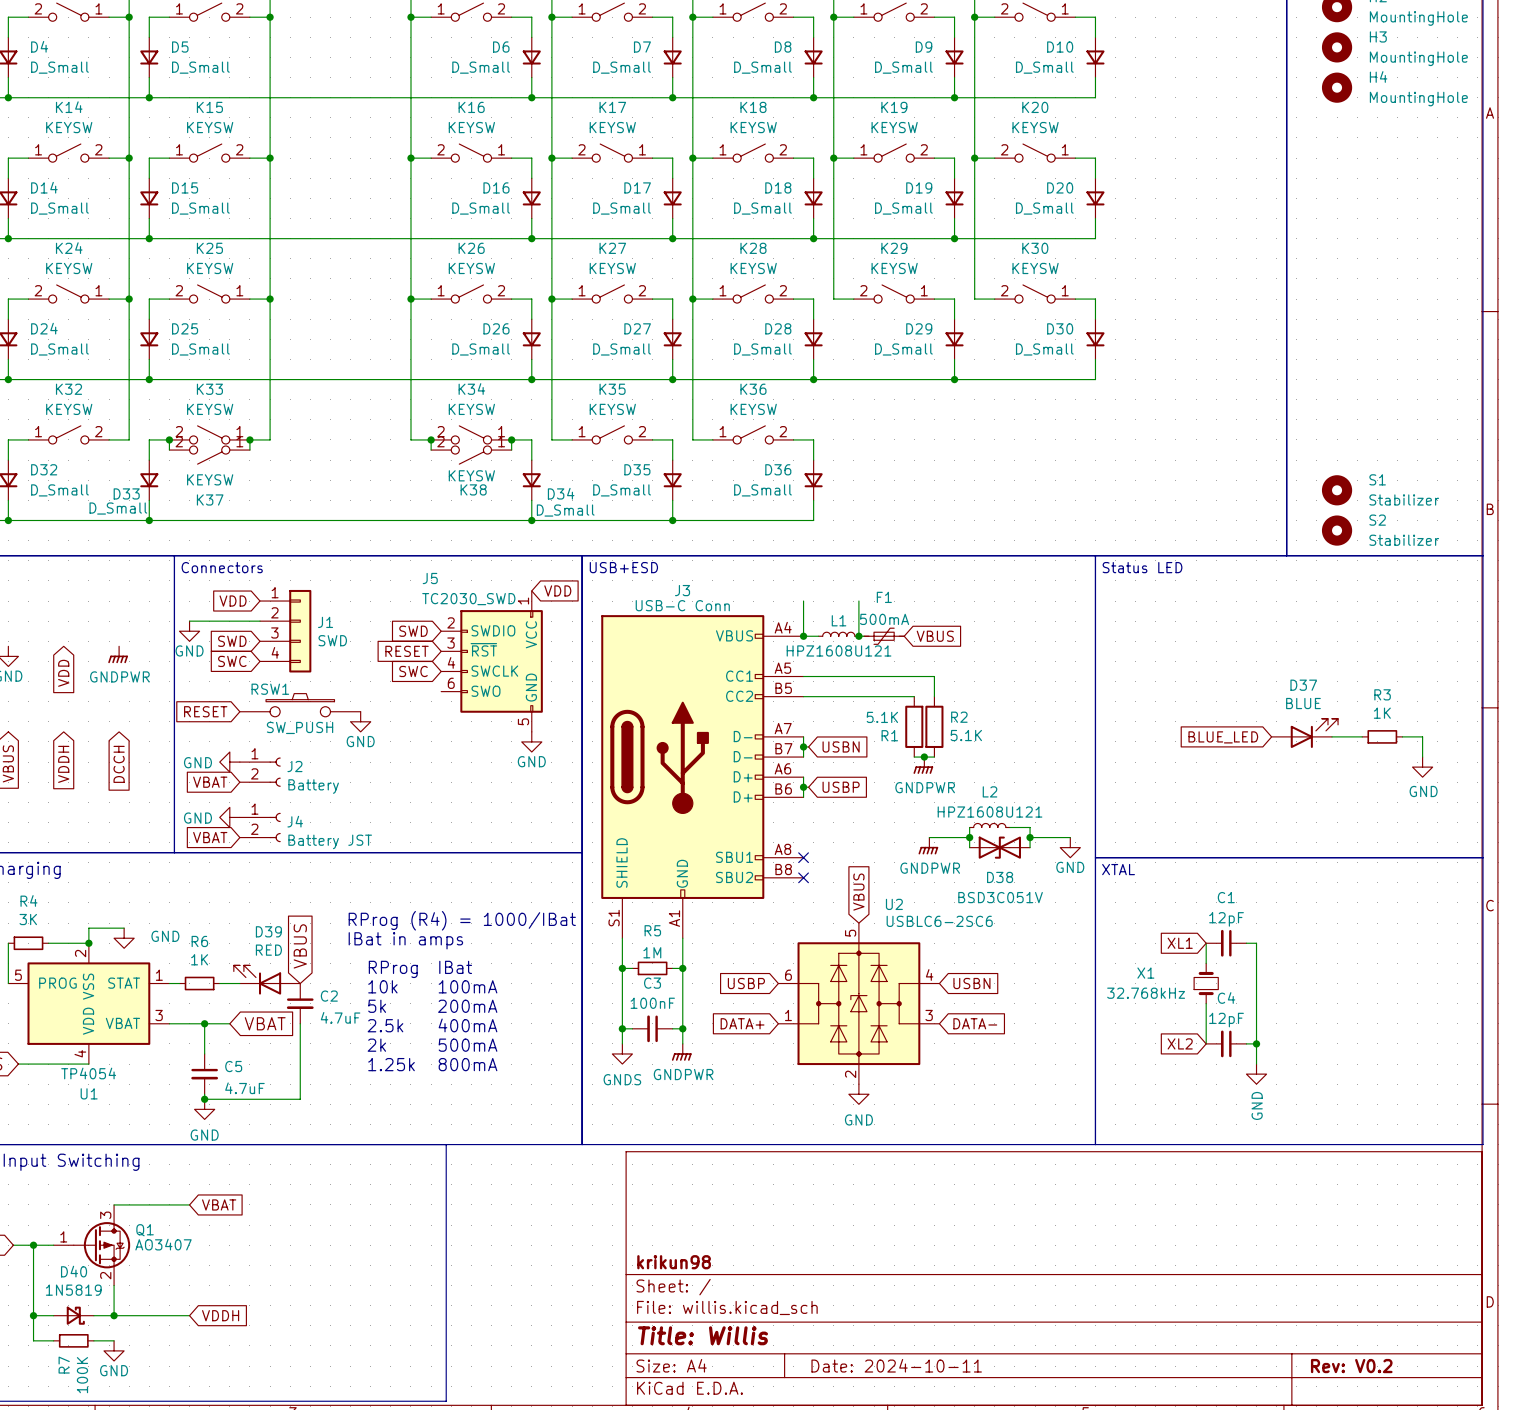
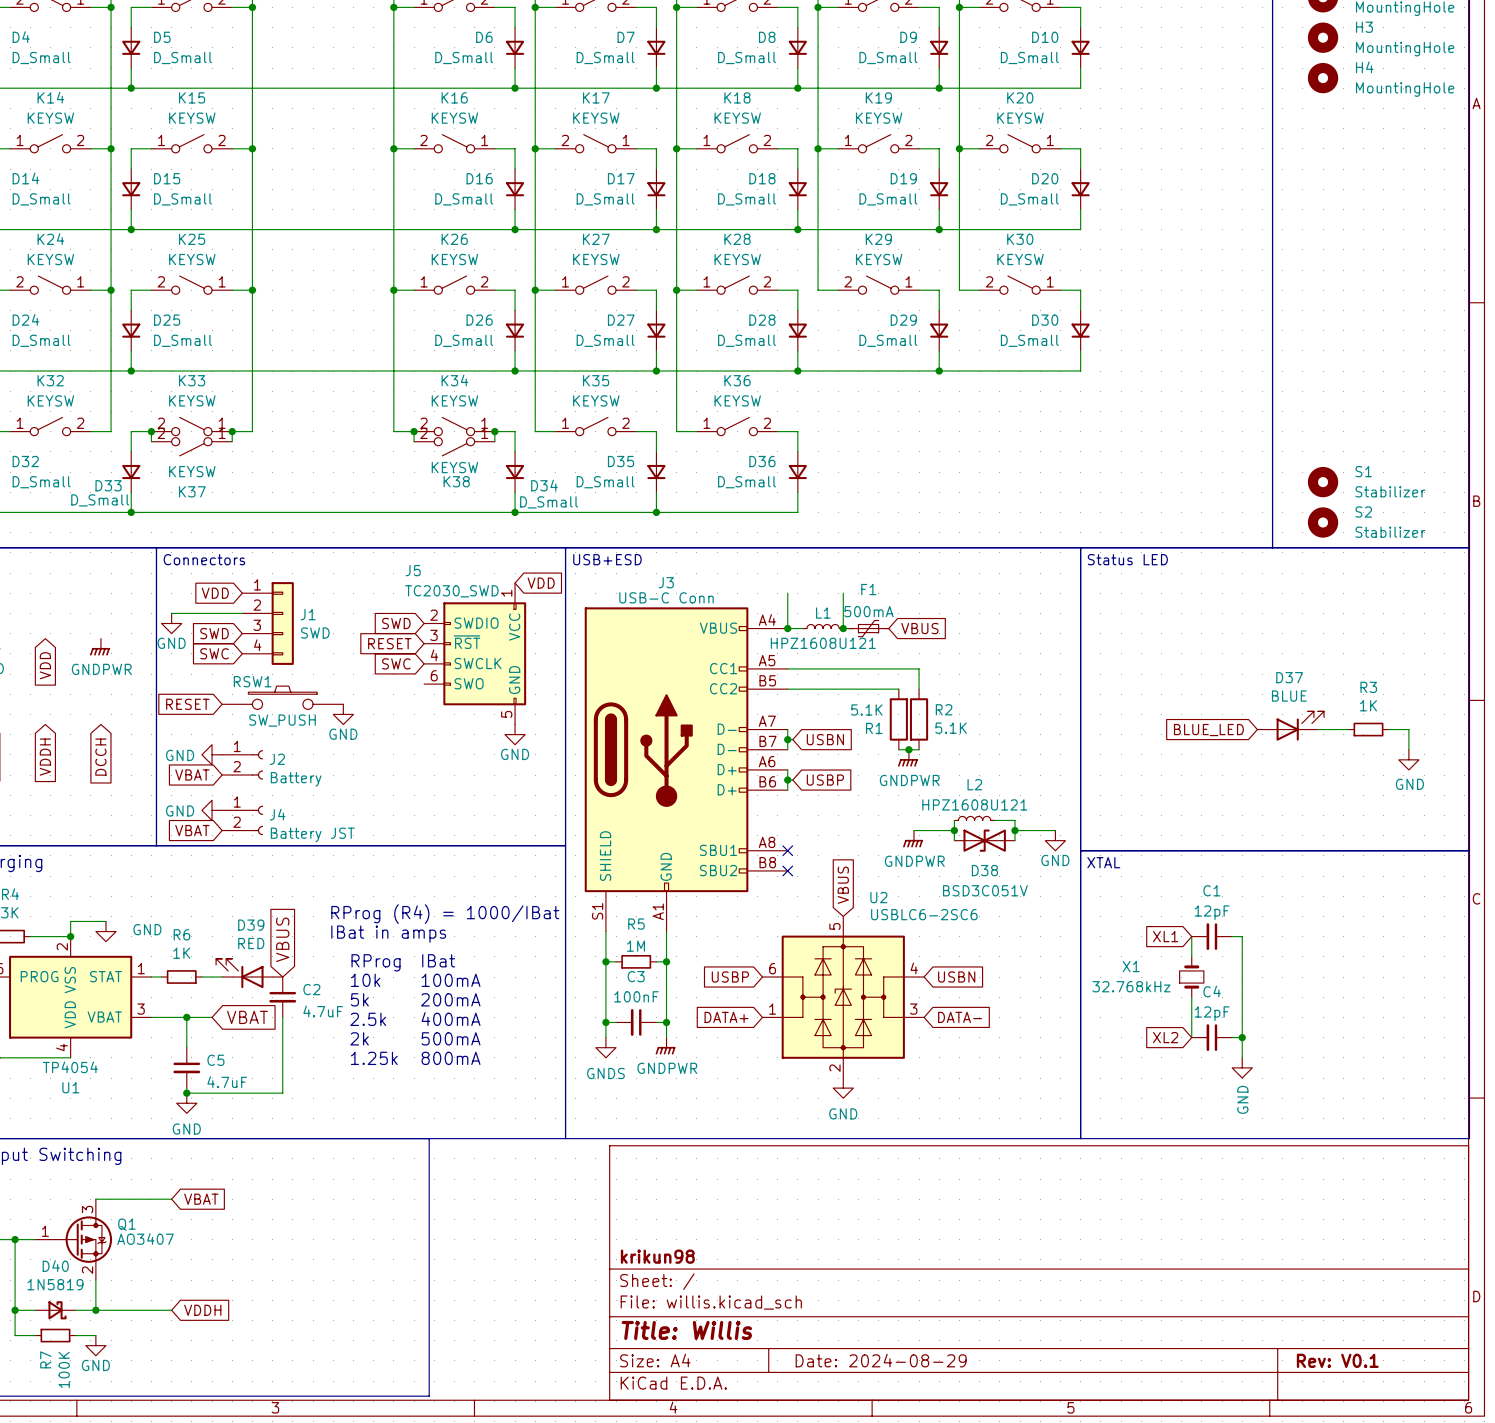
title block: Date: 2024-10-11 (896, 1365) -> Date: 2024-08-29 (881, 1360)
title block: Rev: V0.2 (1351, 1366) -> Rev: V0.1 (1337, 1360)

